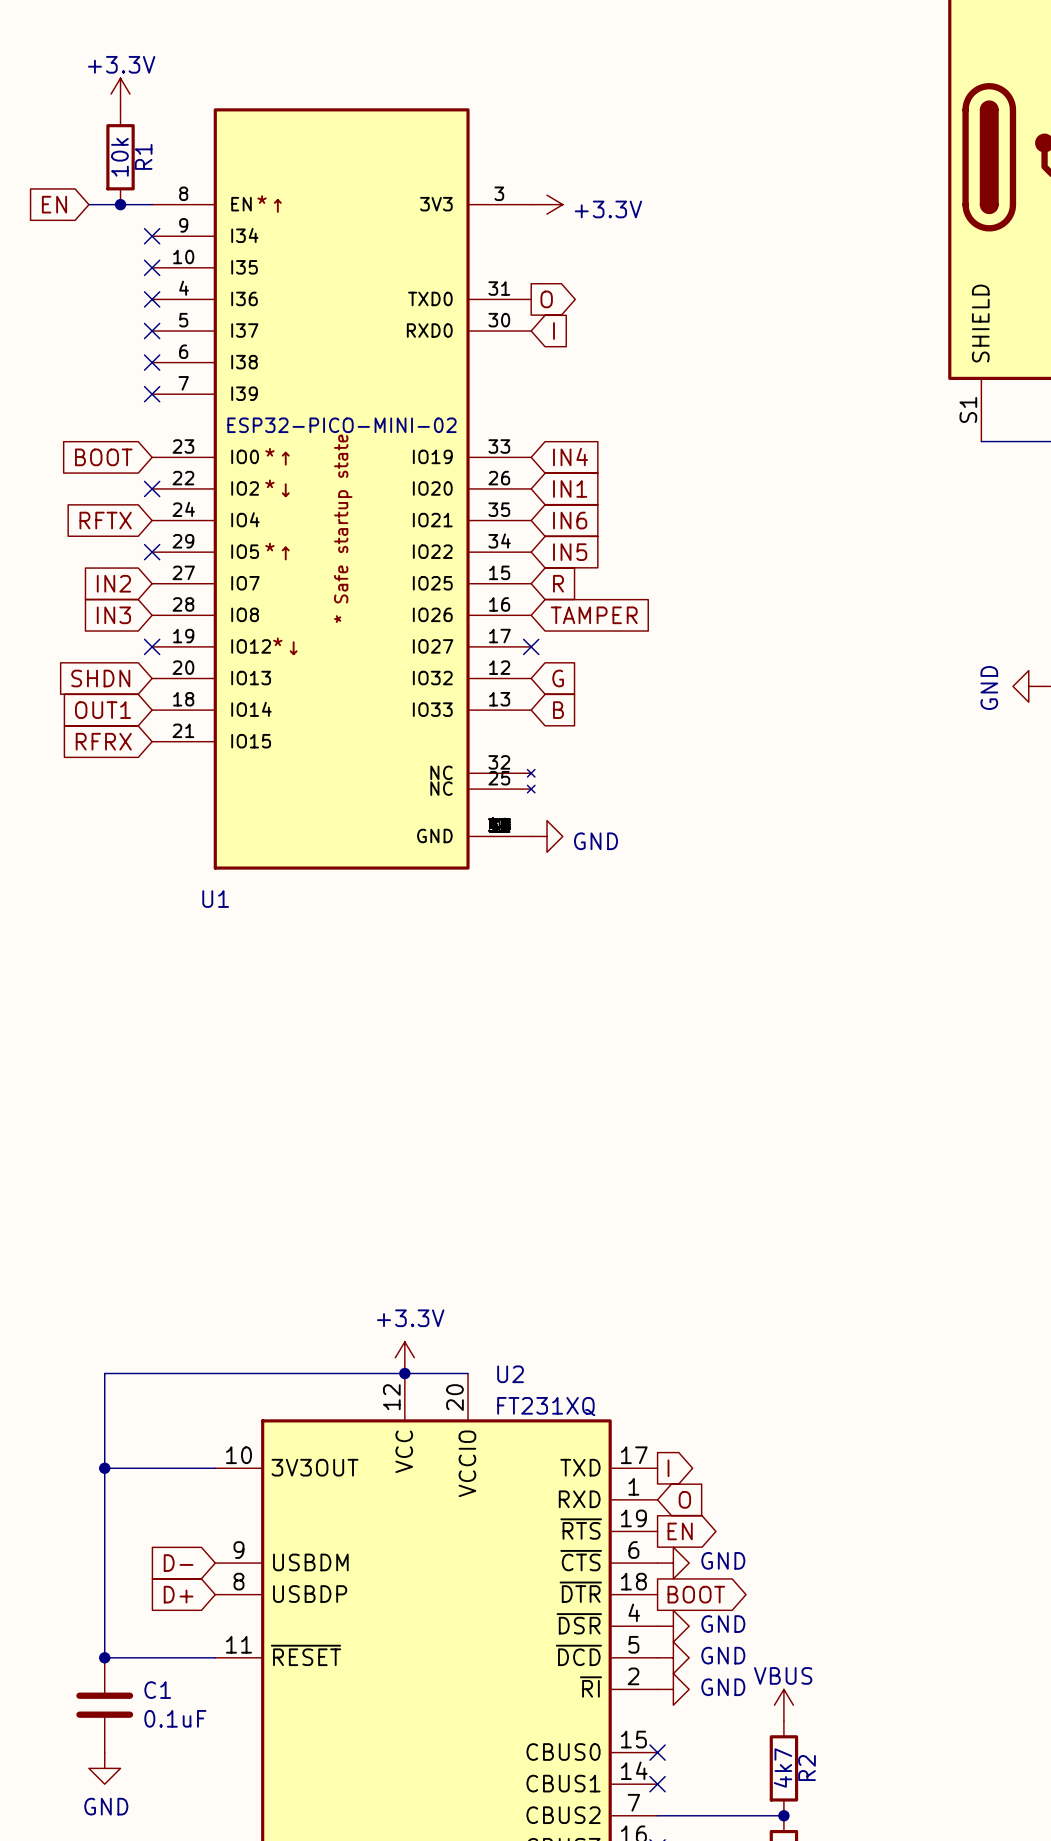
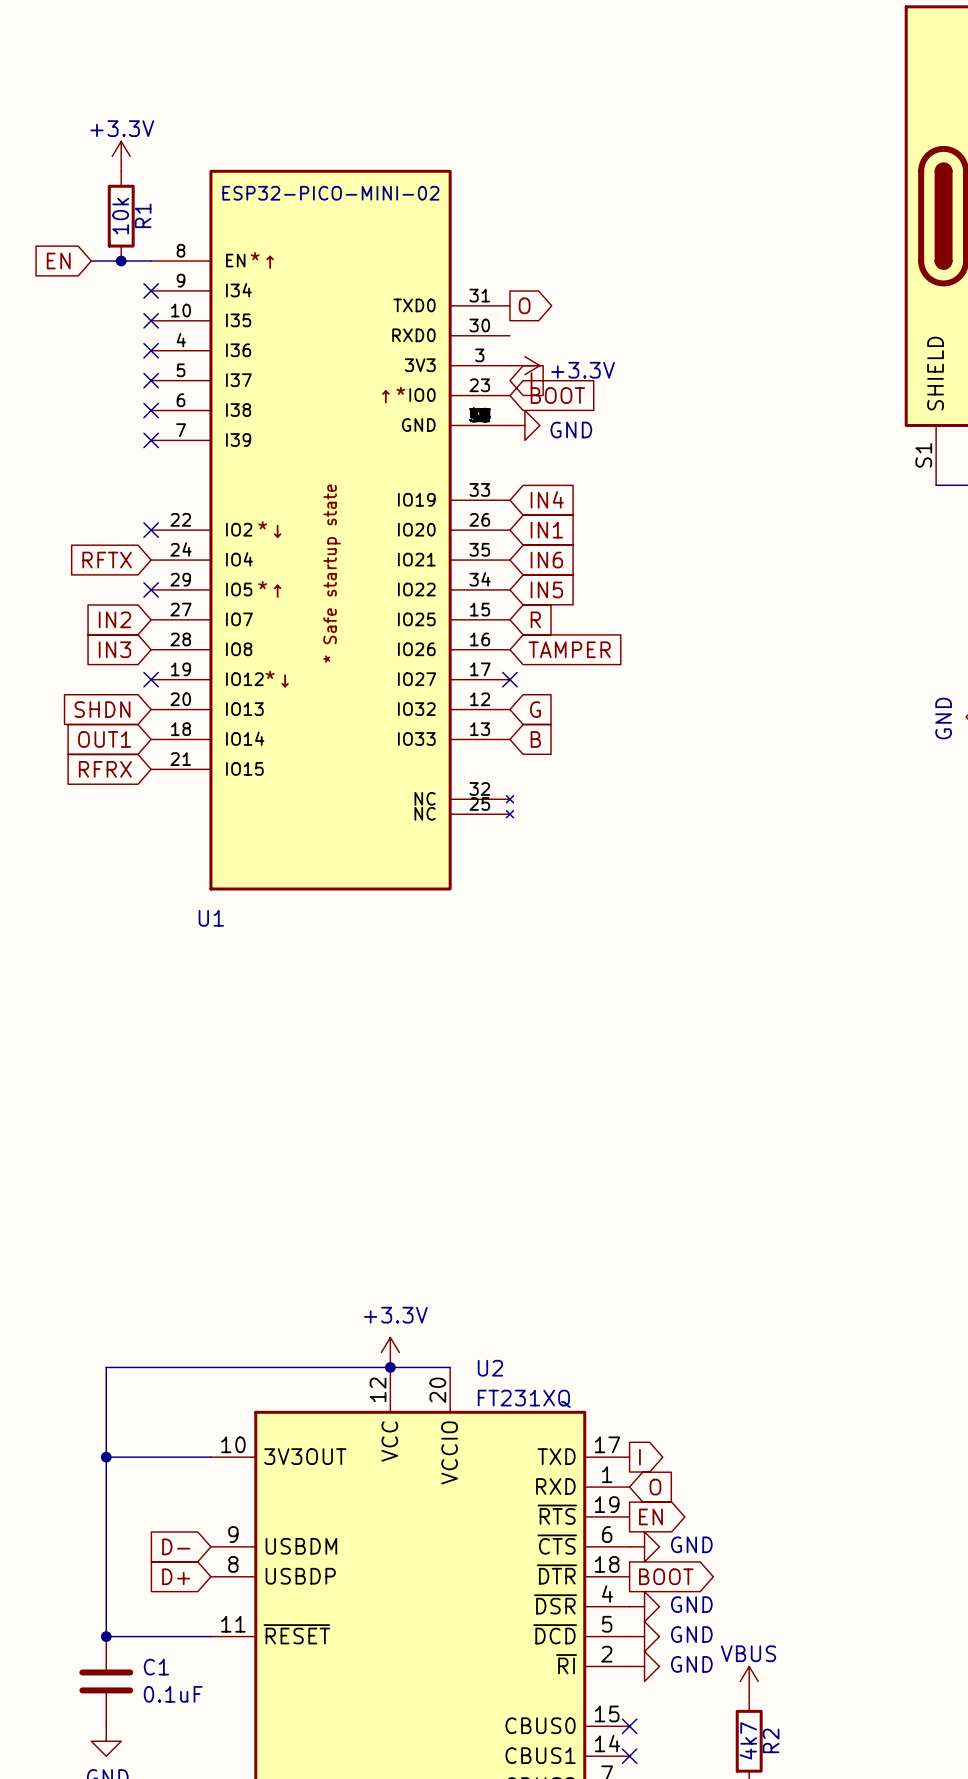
U1 symbol: [152, 108, 535, 870] -> [151, 169, 514, 891]
power symbol position: +3.3V (547, 204) -> +3.3V (524, 365)
global label position: O (546, 299) -> O (524, 305)
global label: none -> BOOT (557, 395)
power symbol: none -> GND (524, 425)
U1 value position: ESP32-PICO-MINI-02 (341, 425) -> ESP32-PICO-MINI-02 (330, 193)
global label: BOOT (103, 457) -> none
power symbol: GND (547, 836) -> none

